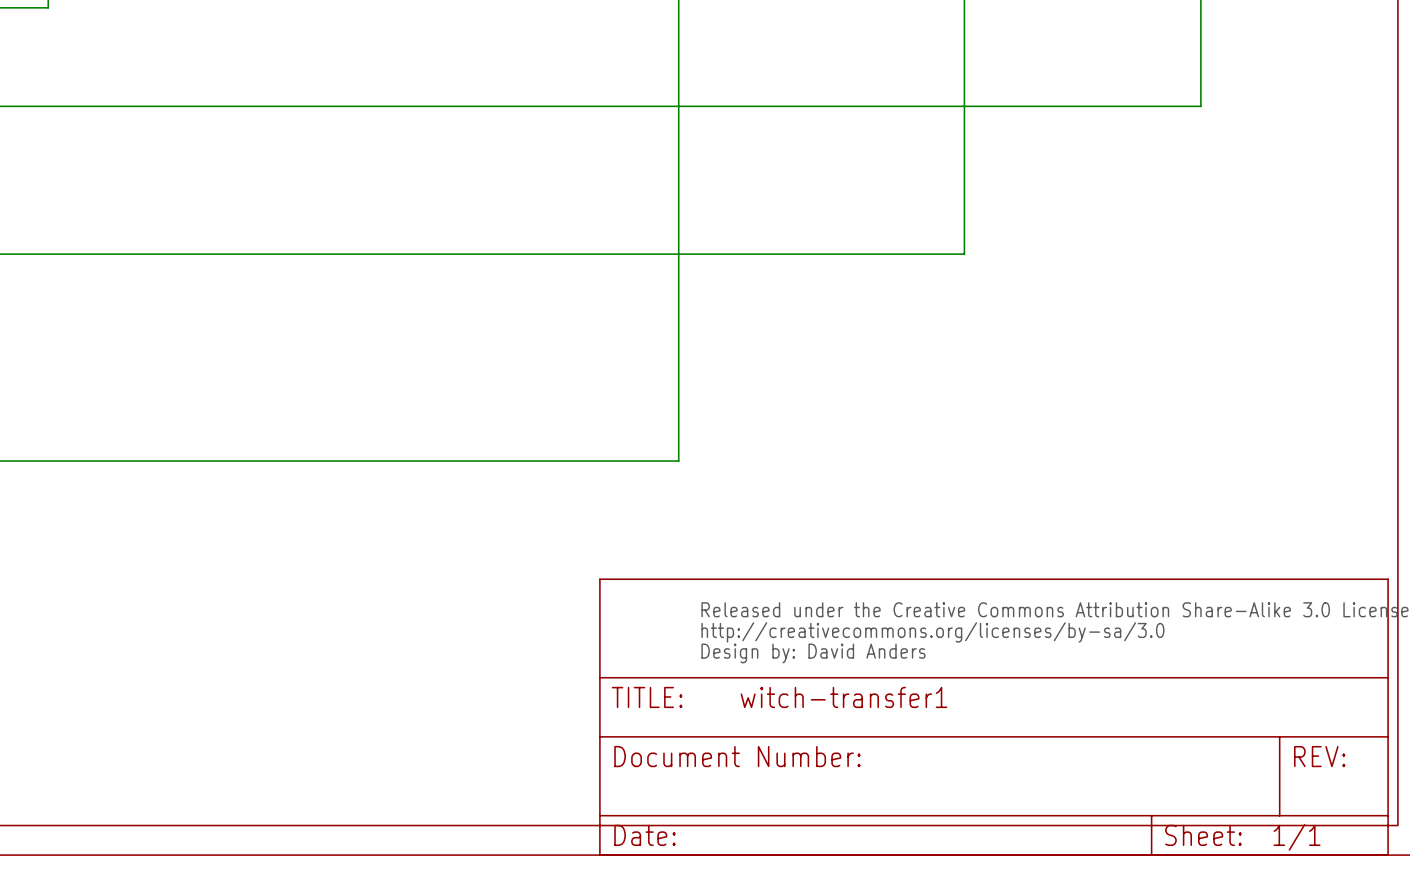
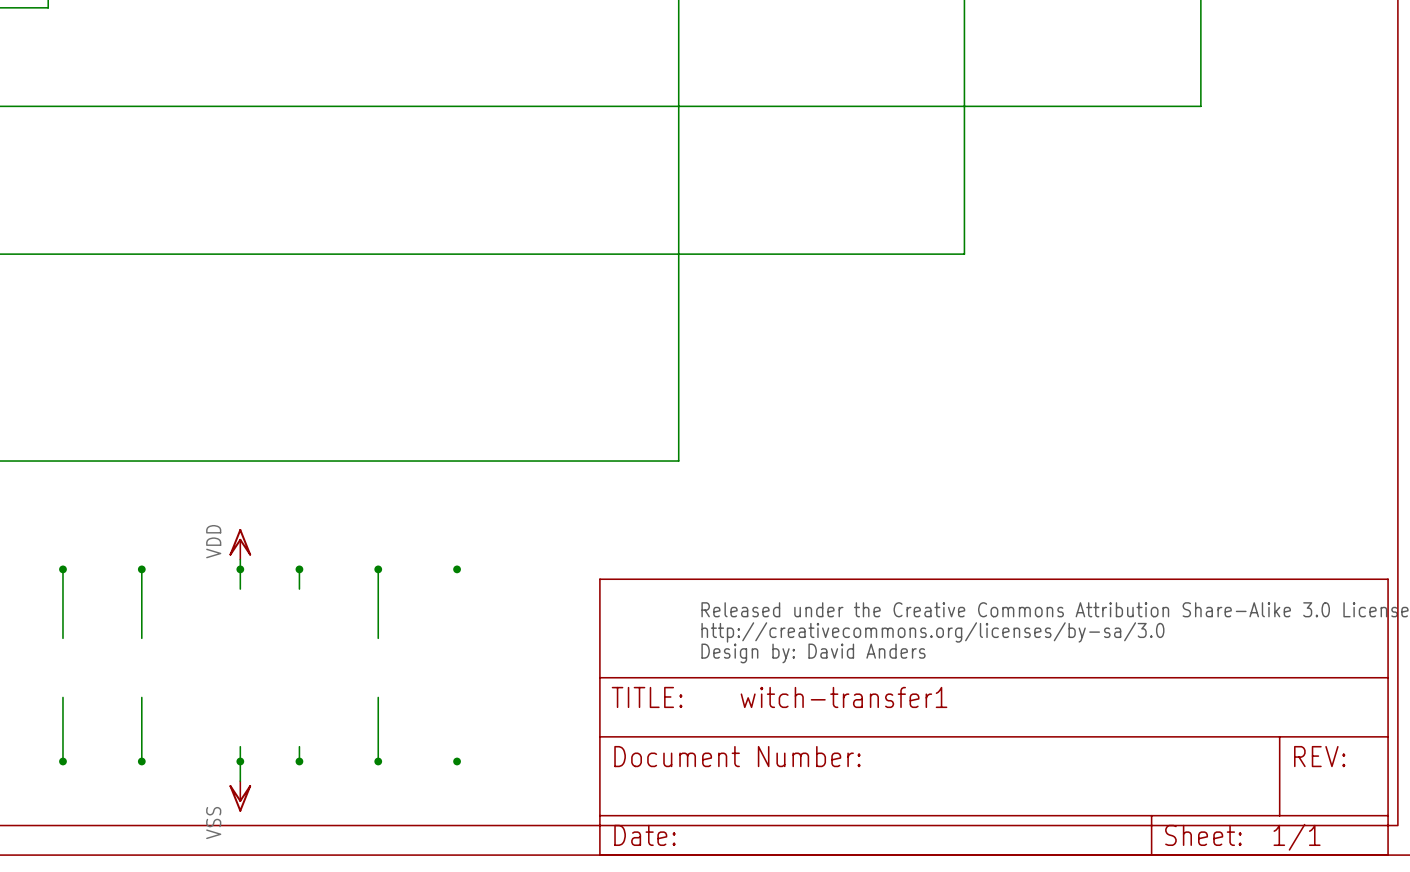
power symbol: none -> VDD (240, 544)
wire: none -> (240, 559) (240, 589)
wire: none -> (62, 569) (62, 638)
junction: none -> (62, 569)
wire: none -> (141, 569) (141, 638)
junction: none -> (141, 569)
junction: none -> (240, 569)
wire: none -> (299, 569) (299, 589)
junction: none -> (299, 569)
wire: none -> (378, 569) (378, 638)
junction: none -> (378, 569)
junction: none -> (457, 569)
wire: none -> (62, 697) (62, 761)
wire: none -> (141, 697) (141, 761)
wire: none -> (378, 697) (378, 761)
wire: none -> (240, 746) (240, 781)
wire: none -> (299, 746) (299, 761)
junction: none -> (62, 761)
junction: none -> (141, 761)
junction: none -> (240, 761)
junction: none -> (299, 761)
junction: none -> (378, 761)
junction: none -> (457, 761)
power symbol: none -> VSS (240, 796)

